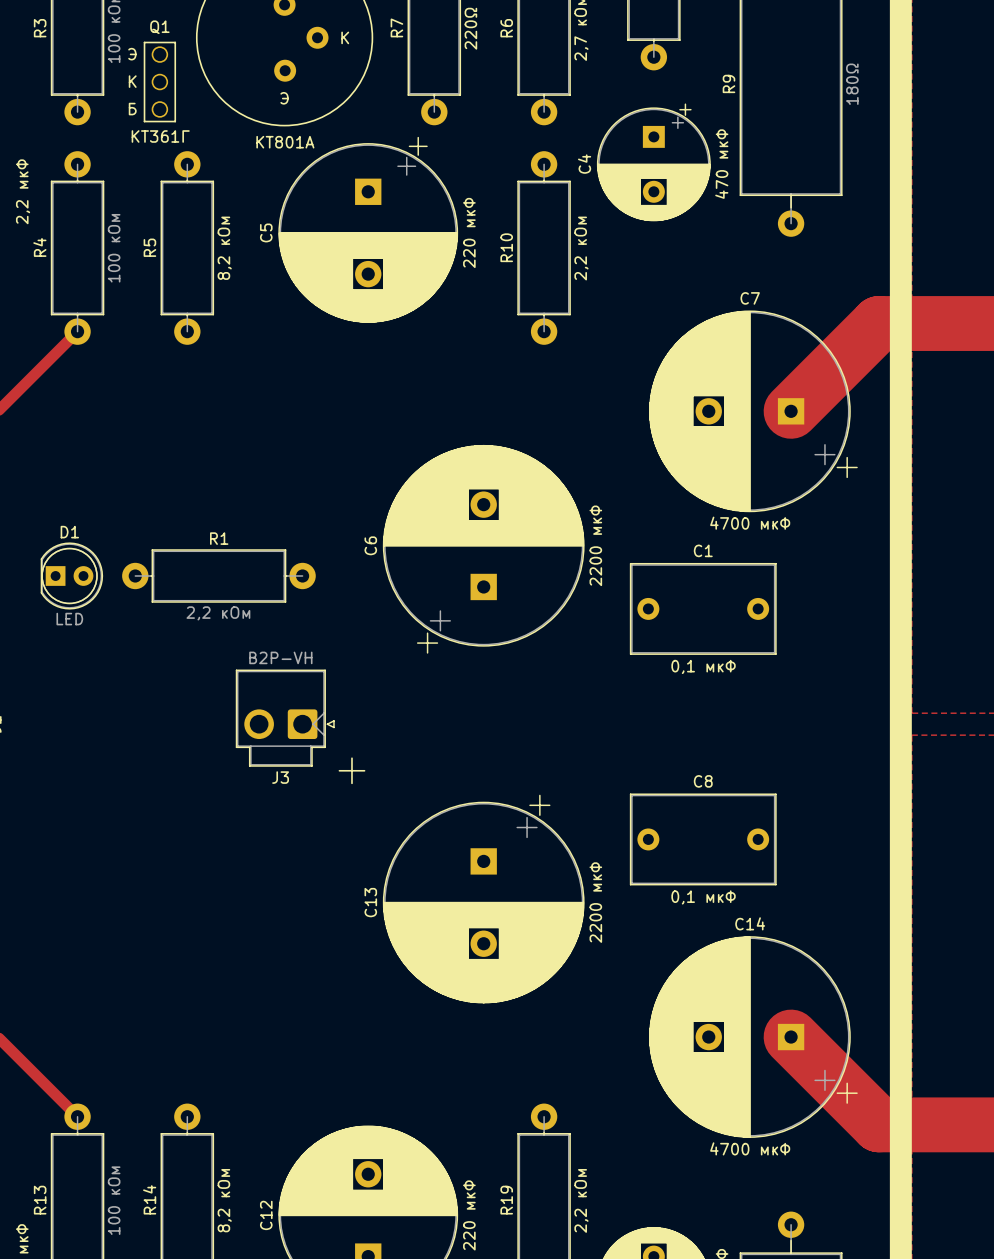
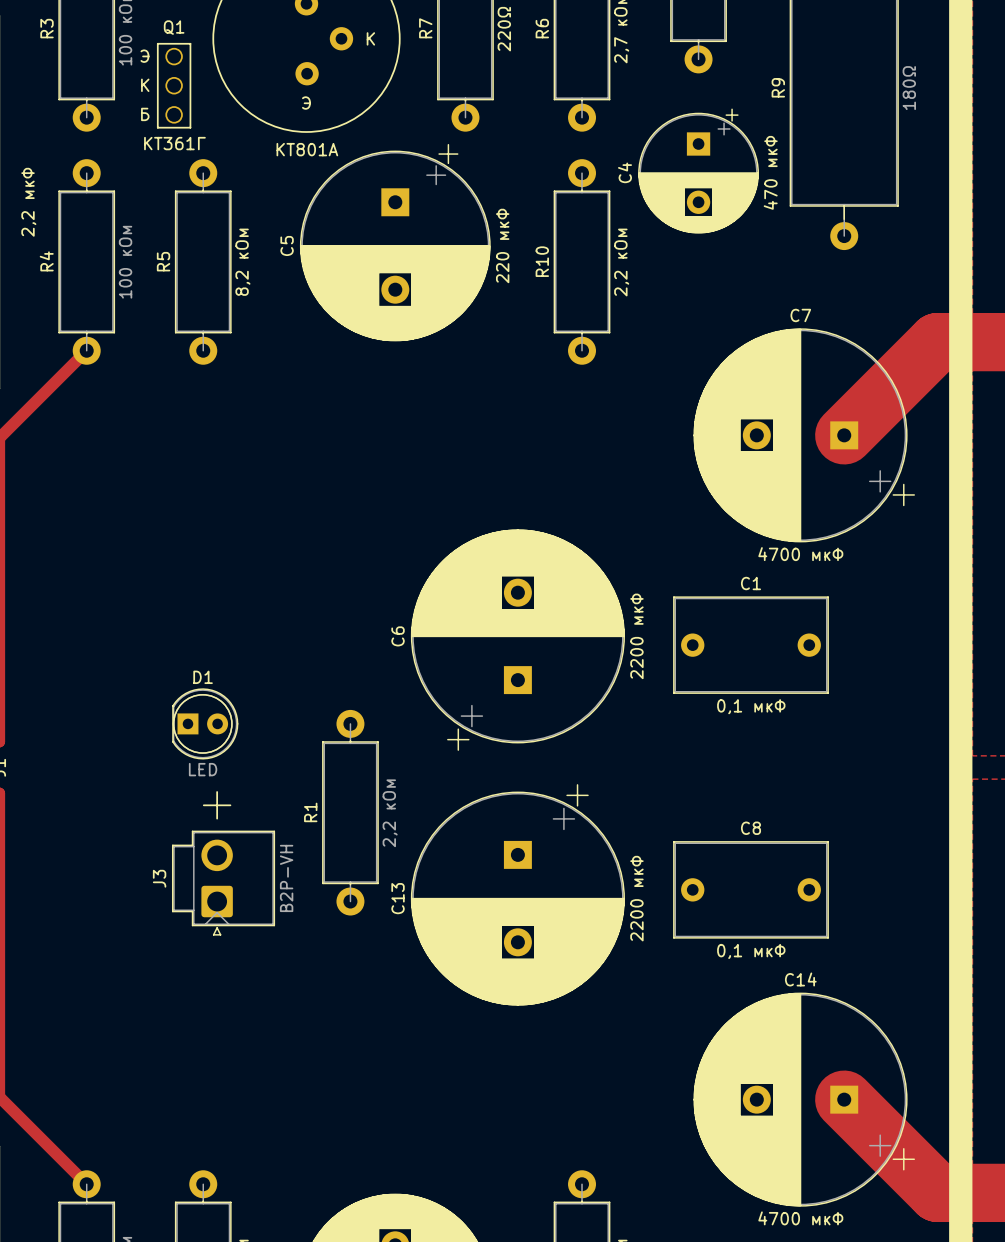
R1 name position: R1 (219, 538) -> R1 (310, 812)
C6 position: (483, 549) -> (517, 640)
D1 position: (71, 575) -> (205, 723)
R1 rotation: 0° (218, 575) -> 90° clockwise (350, 812)
R1 position: (218, 575) -> (350, 812)
R1 value position: 2,2 кОм (218, 613) -> 2,2 кОм (390, 813)
J3 rotation: 0° (285, 718) -> 90° clockwise (223, 883)
J3 position: (285, 718) -> (223, 883)
text position: + (351, 770) -> + (217, 805)
C13 position: (483, 899) -> (517, 894)

